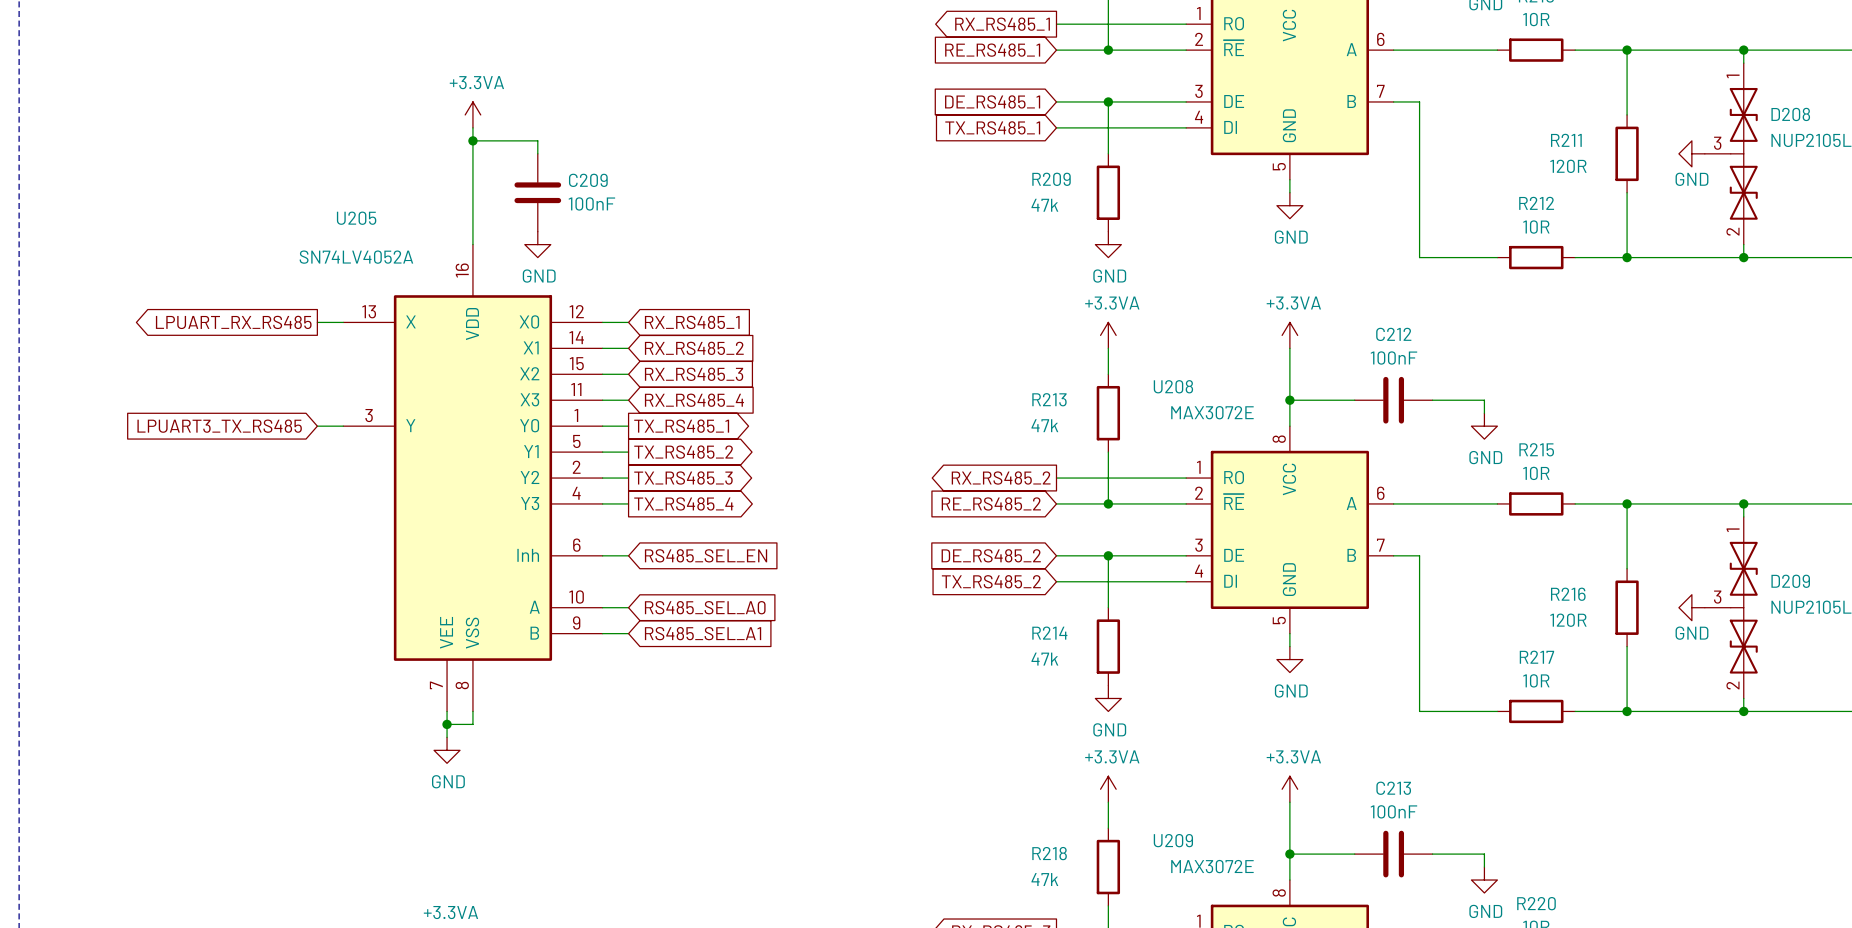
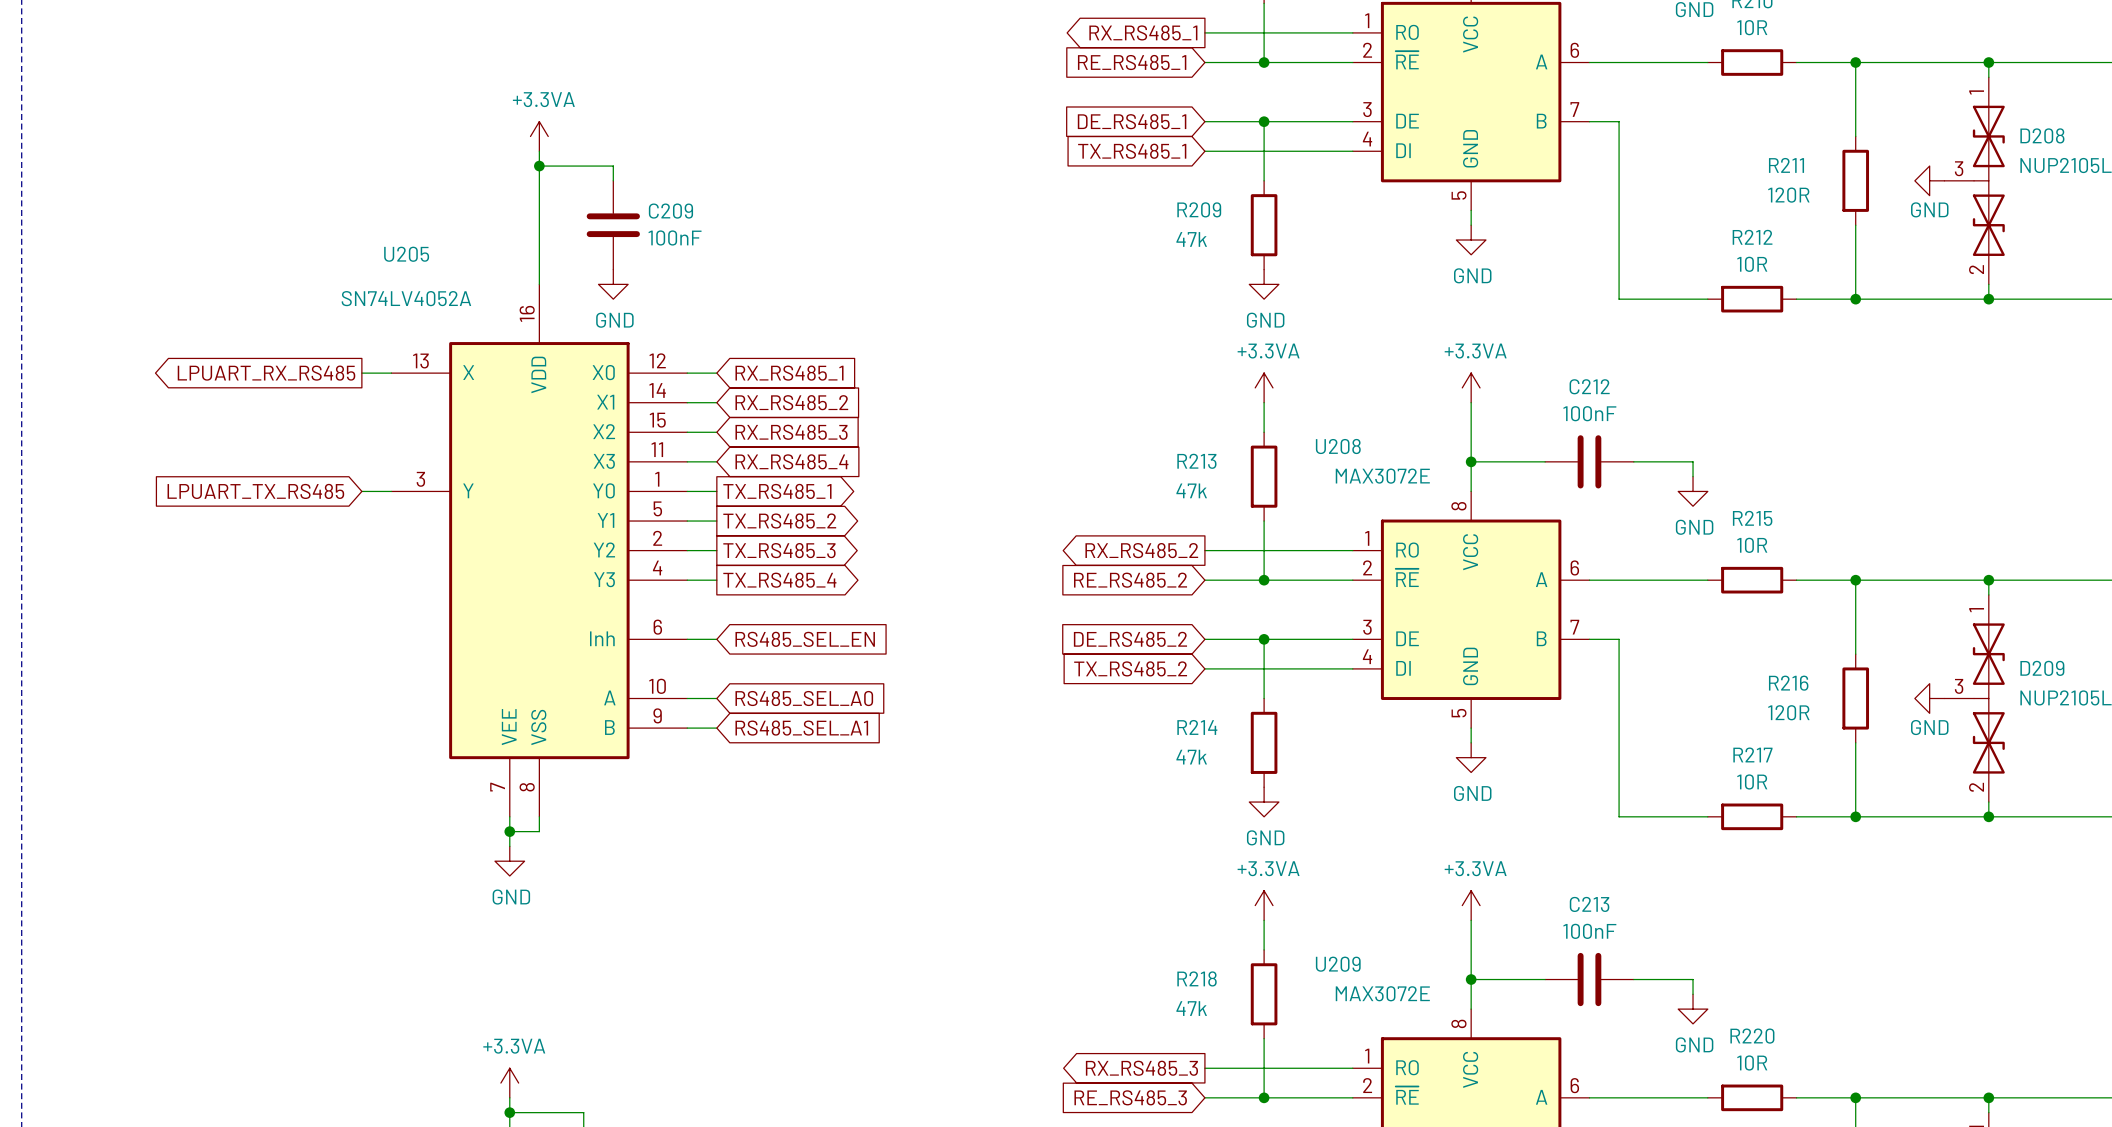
global label: LPUART3_TX_RS485 (219, 426) -> LPUART_TX_RS485 (255, 491)

